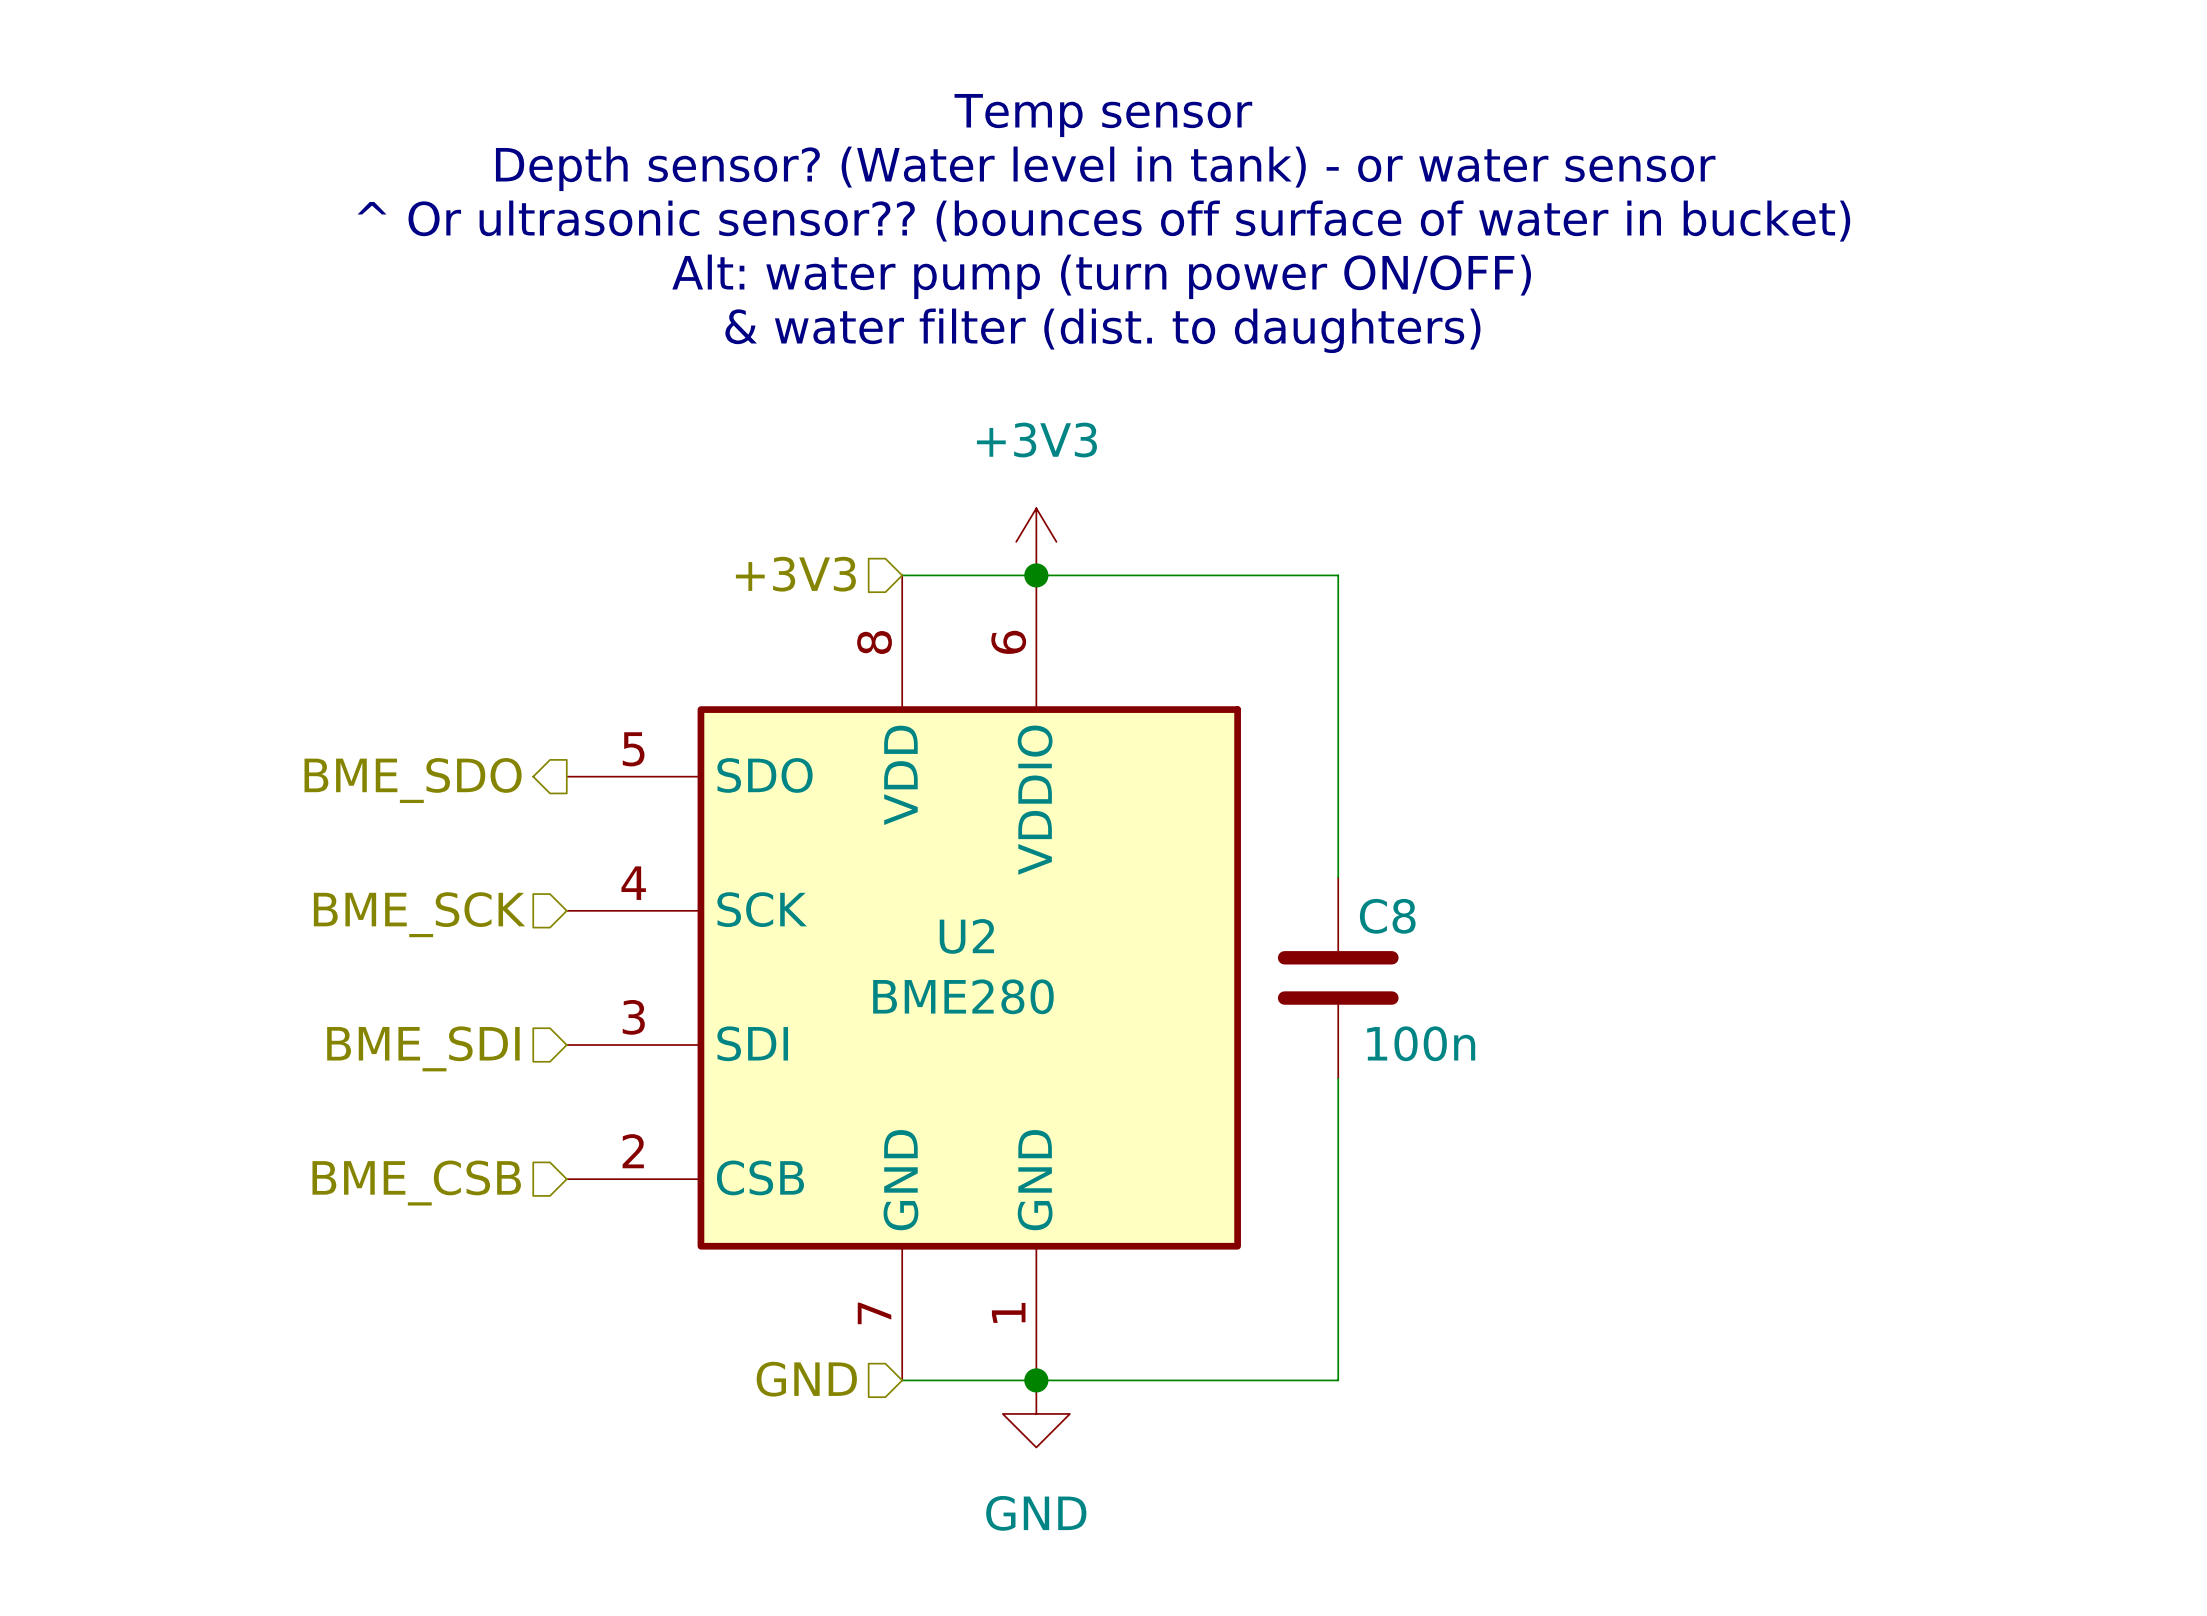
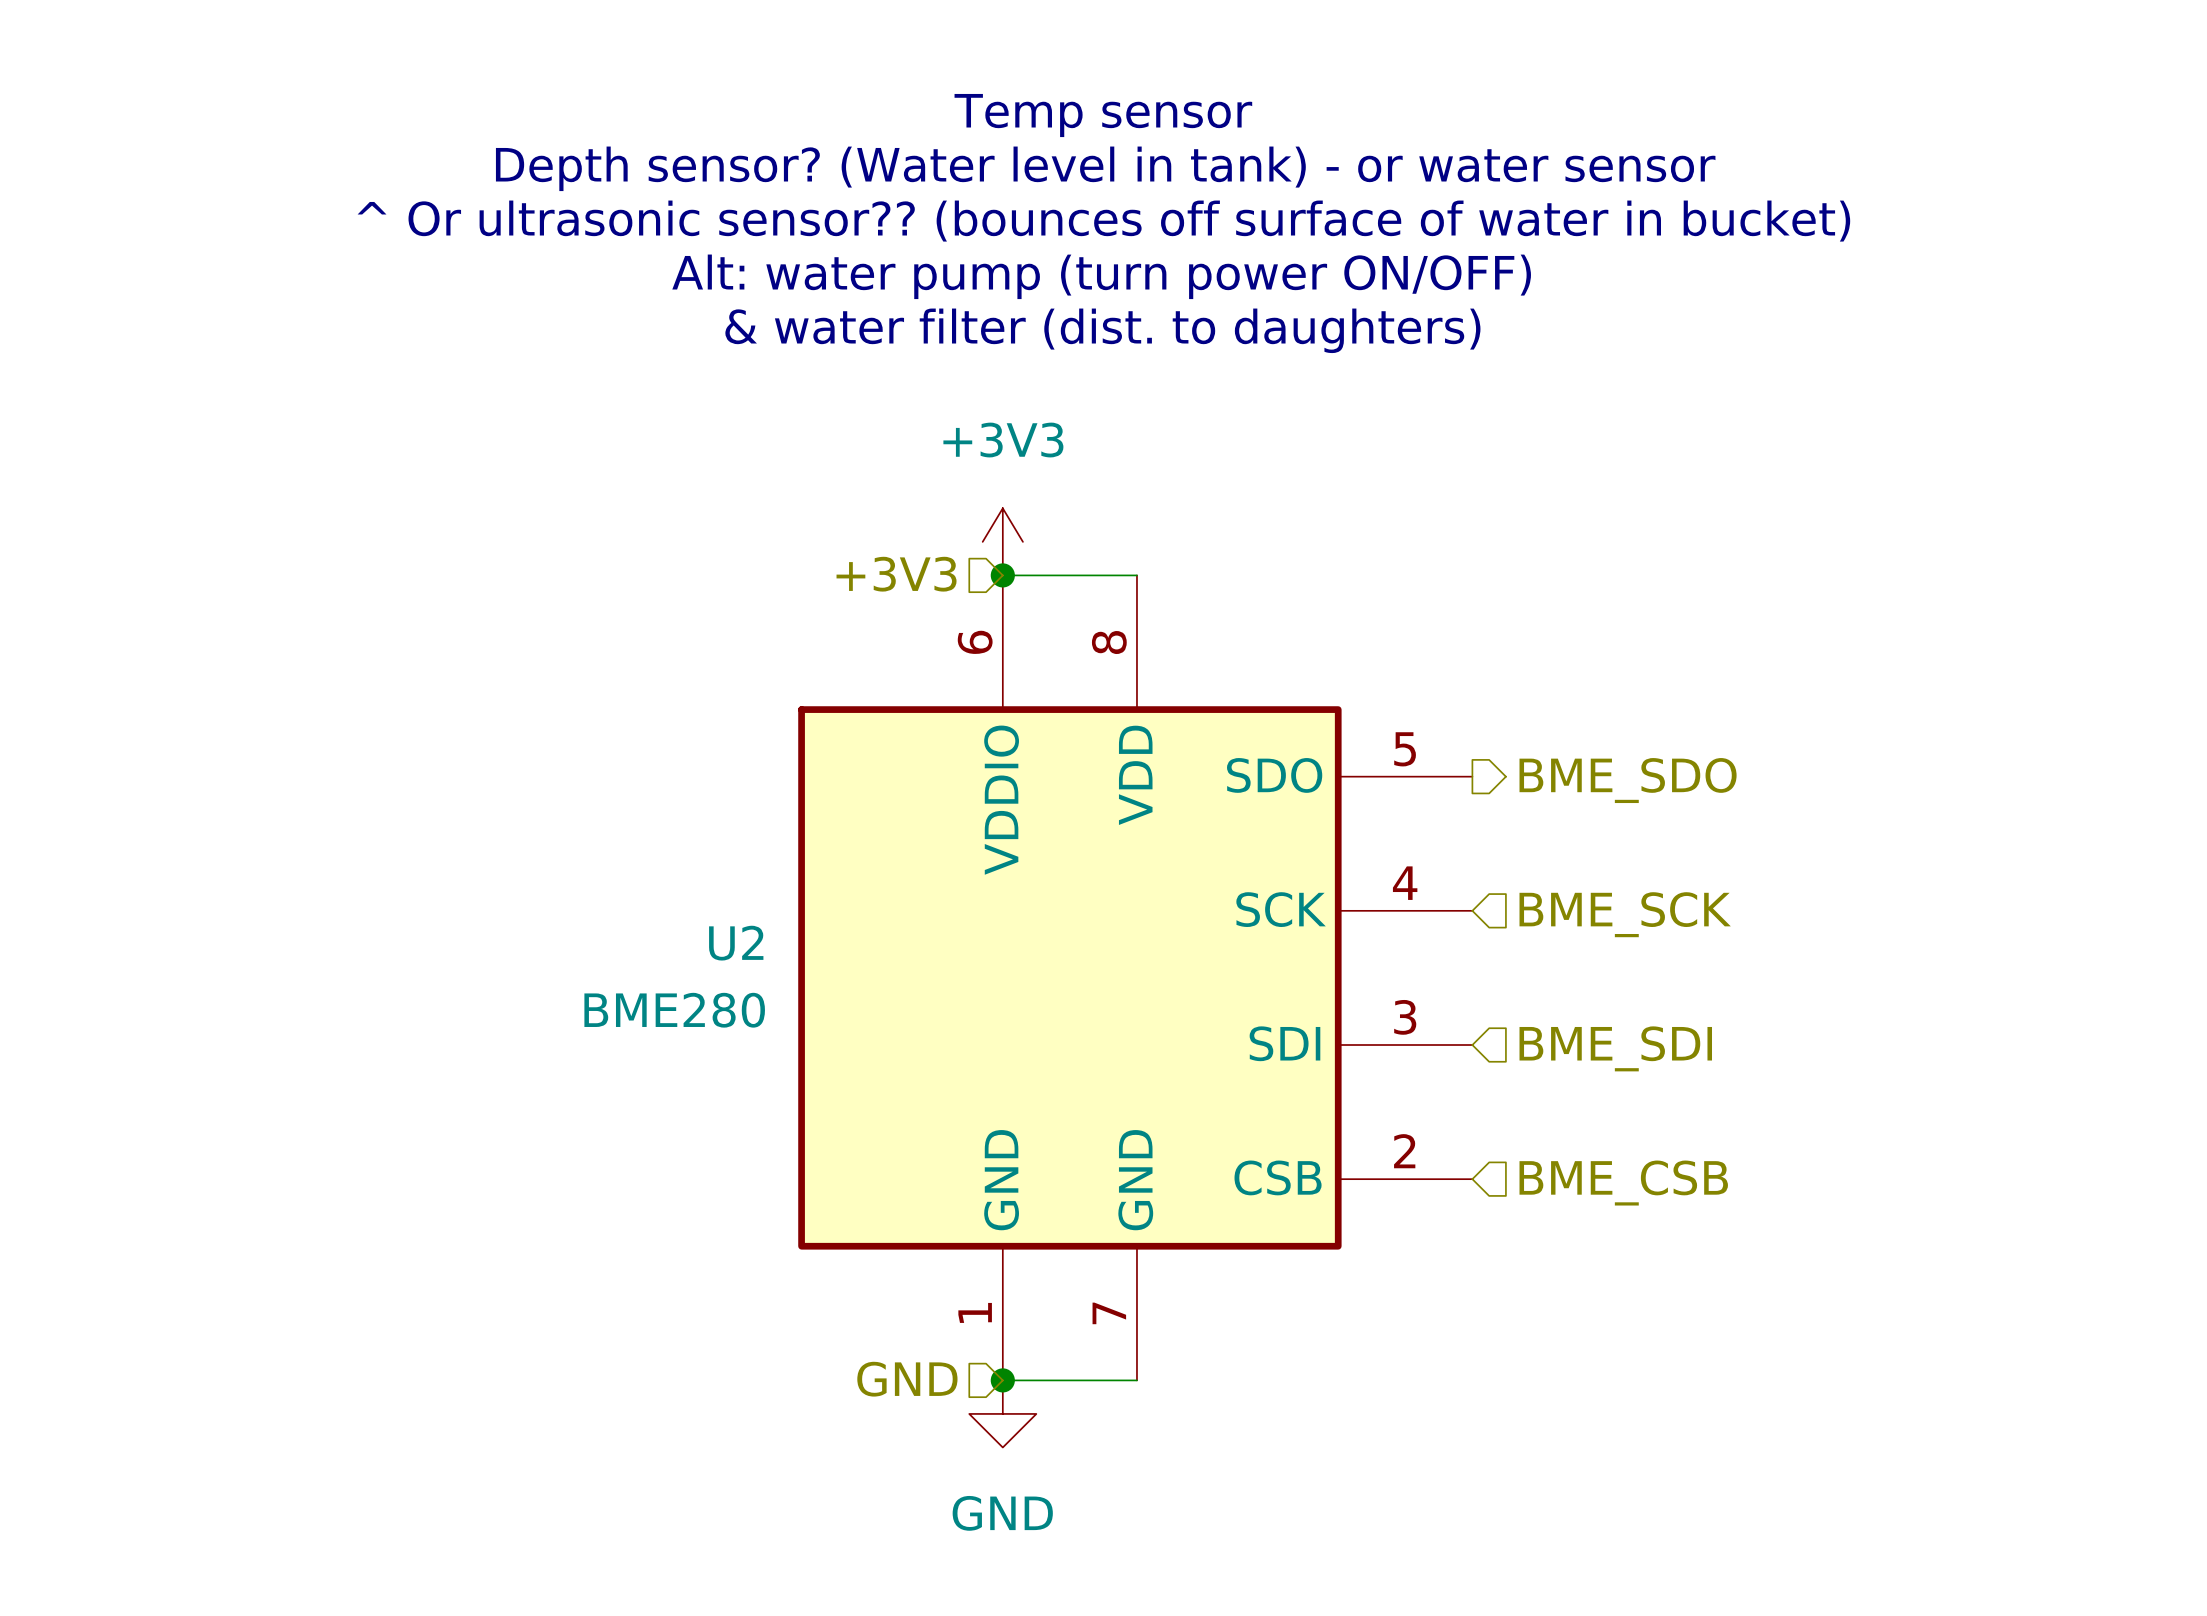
power symbol position: +3V3 (1036, 541) -> +3V3 (1002, 541)
hierarchical label position: +3V3 (795, 574) -> +3V3 (896, 574)
wire: (902, 575) (1002, 575) -> none
junction position: (1036, 575) -> (1002, 575)
wire: (1136, 575) (1338, 575) (1338, 877) -> none
hierarchical label: BME_SDO (413, 780) -> none
hierarchical label: none -> BME_SDO (1628, 780)
hierarchical label: BME_SCK (419, 914) -> none
hierarchical label: none -> BME_SCK (1625, 914)
U2 name position: U2 (966, 936) -> U2 (736, 943)
U2 flip: as is (969, 977) -> left-right (1069, 977)
C8: 100n (1338, 977) -> none
U2 value position: BME280 (963, 996) -> BME280 (674, 1010)
hierarchical label: BME_SDI (423, 1048) -> none
hierarchical label: none -> BME_SDI (1615, 1048)
wire: (1338, 1078) (1338, 1380) (1136, 1380) -> none
hierarchical label: BME_CSB (416, 1183) -> none
hierarchical label: none -> BME_CSB (1623, 1183)
hierarchical label position: GND (806, 1379) -> GND (907, 1379)
wire: (902, 1380) (1002, 1380) -> none
junction position: (1036, 1380) -> (1002, 1380)
power symbol position: GND (1036, 1413) -> GND (1002, 1413)

